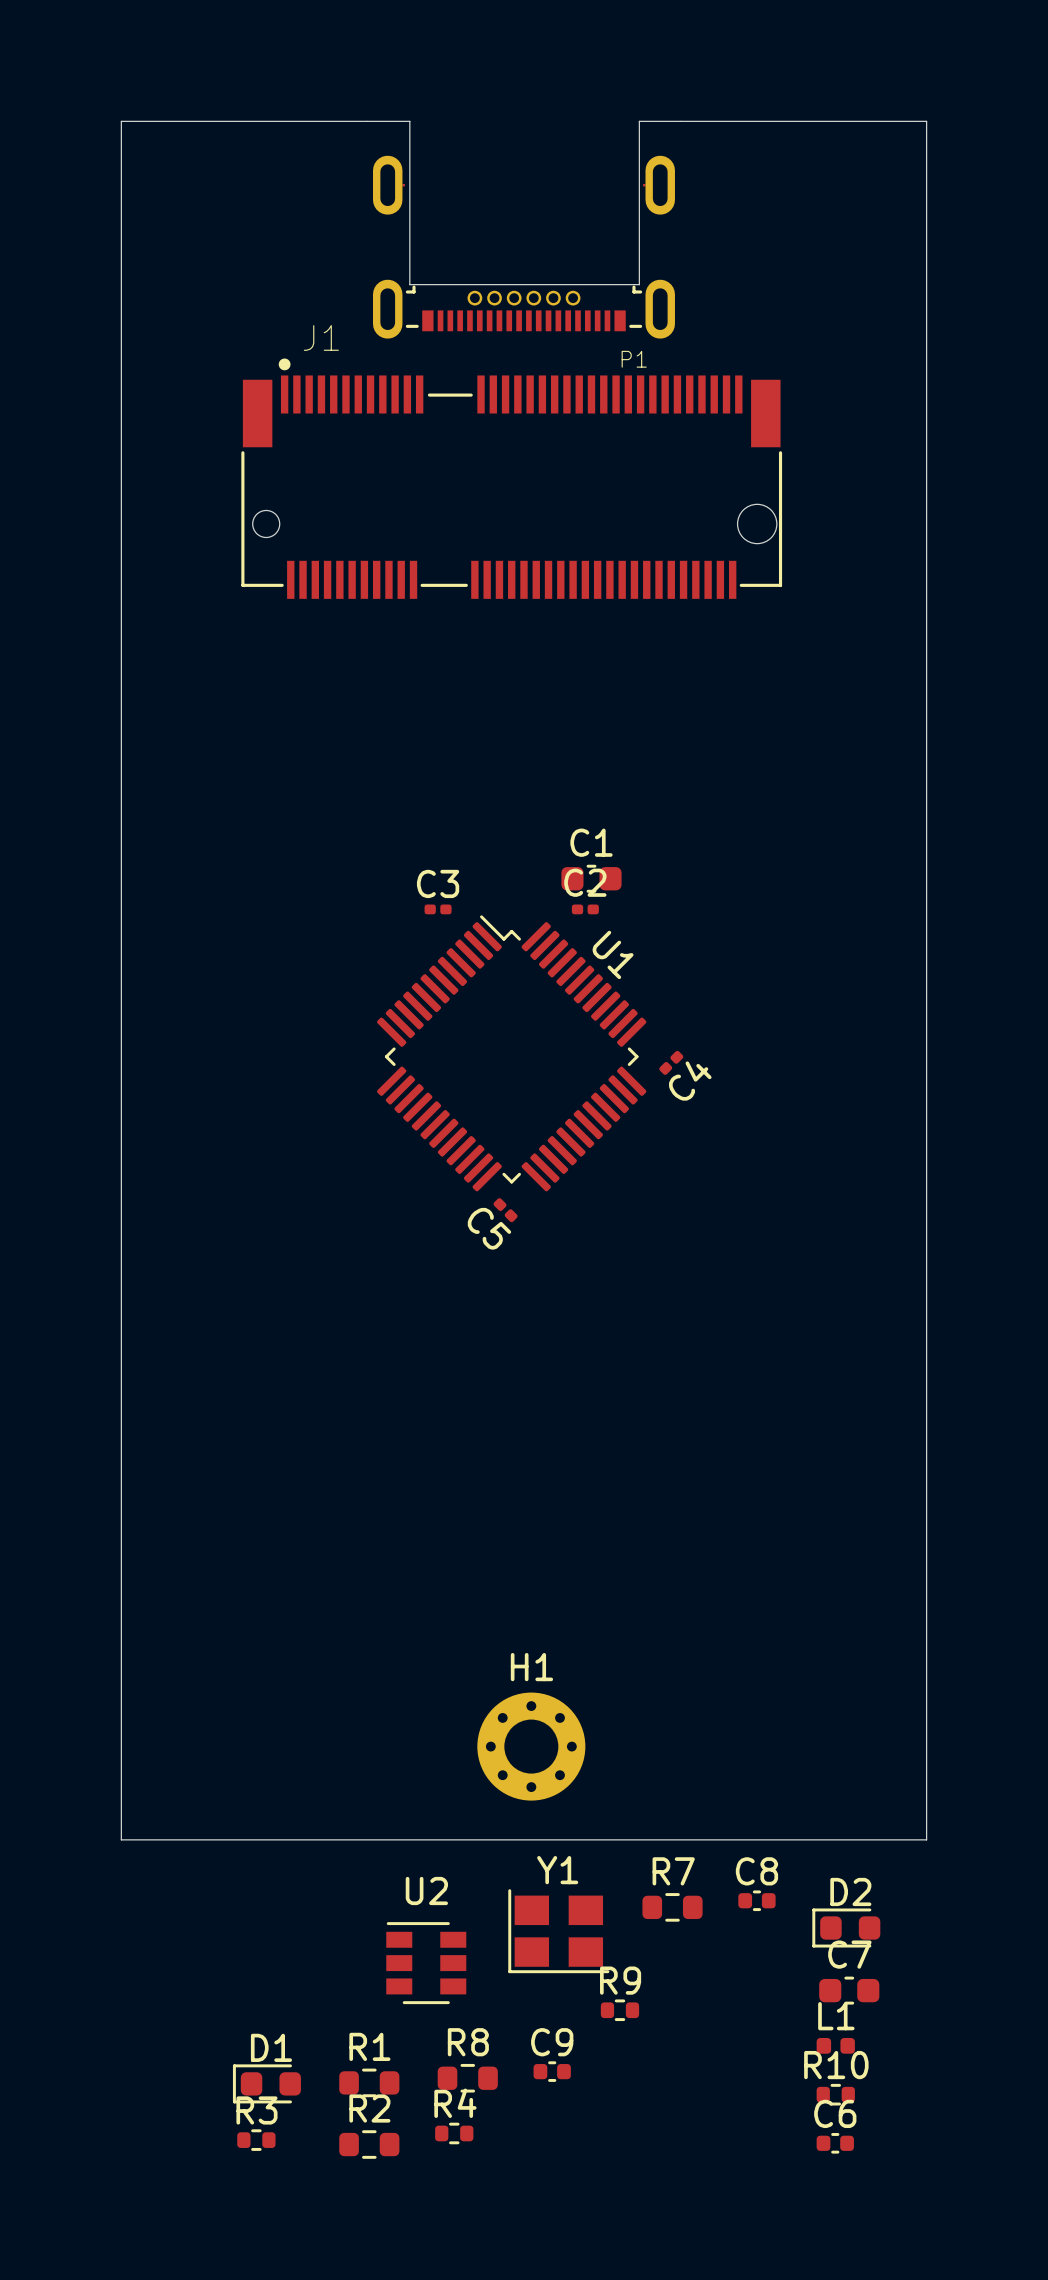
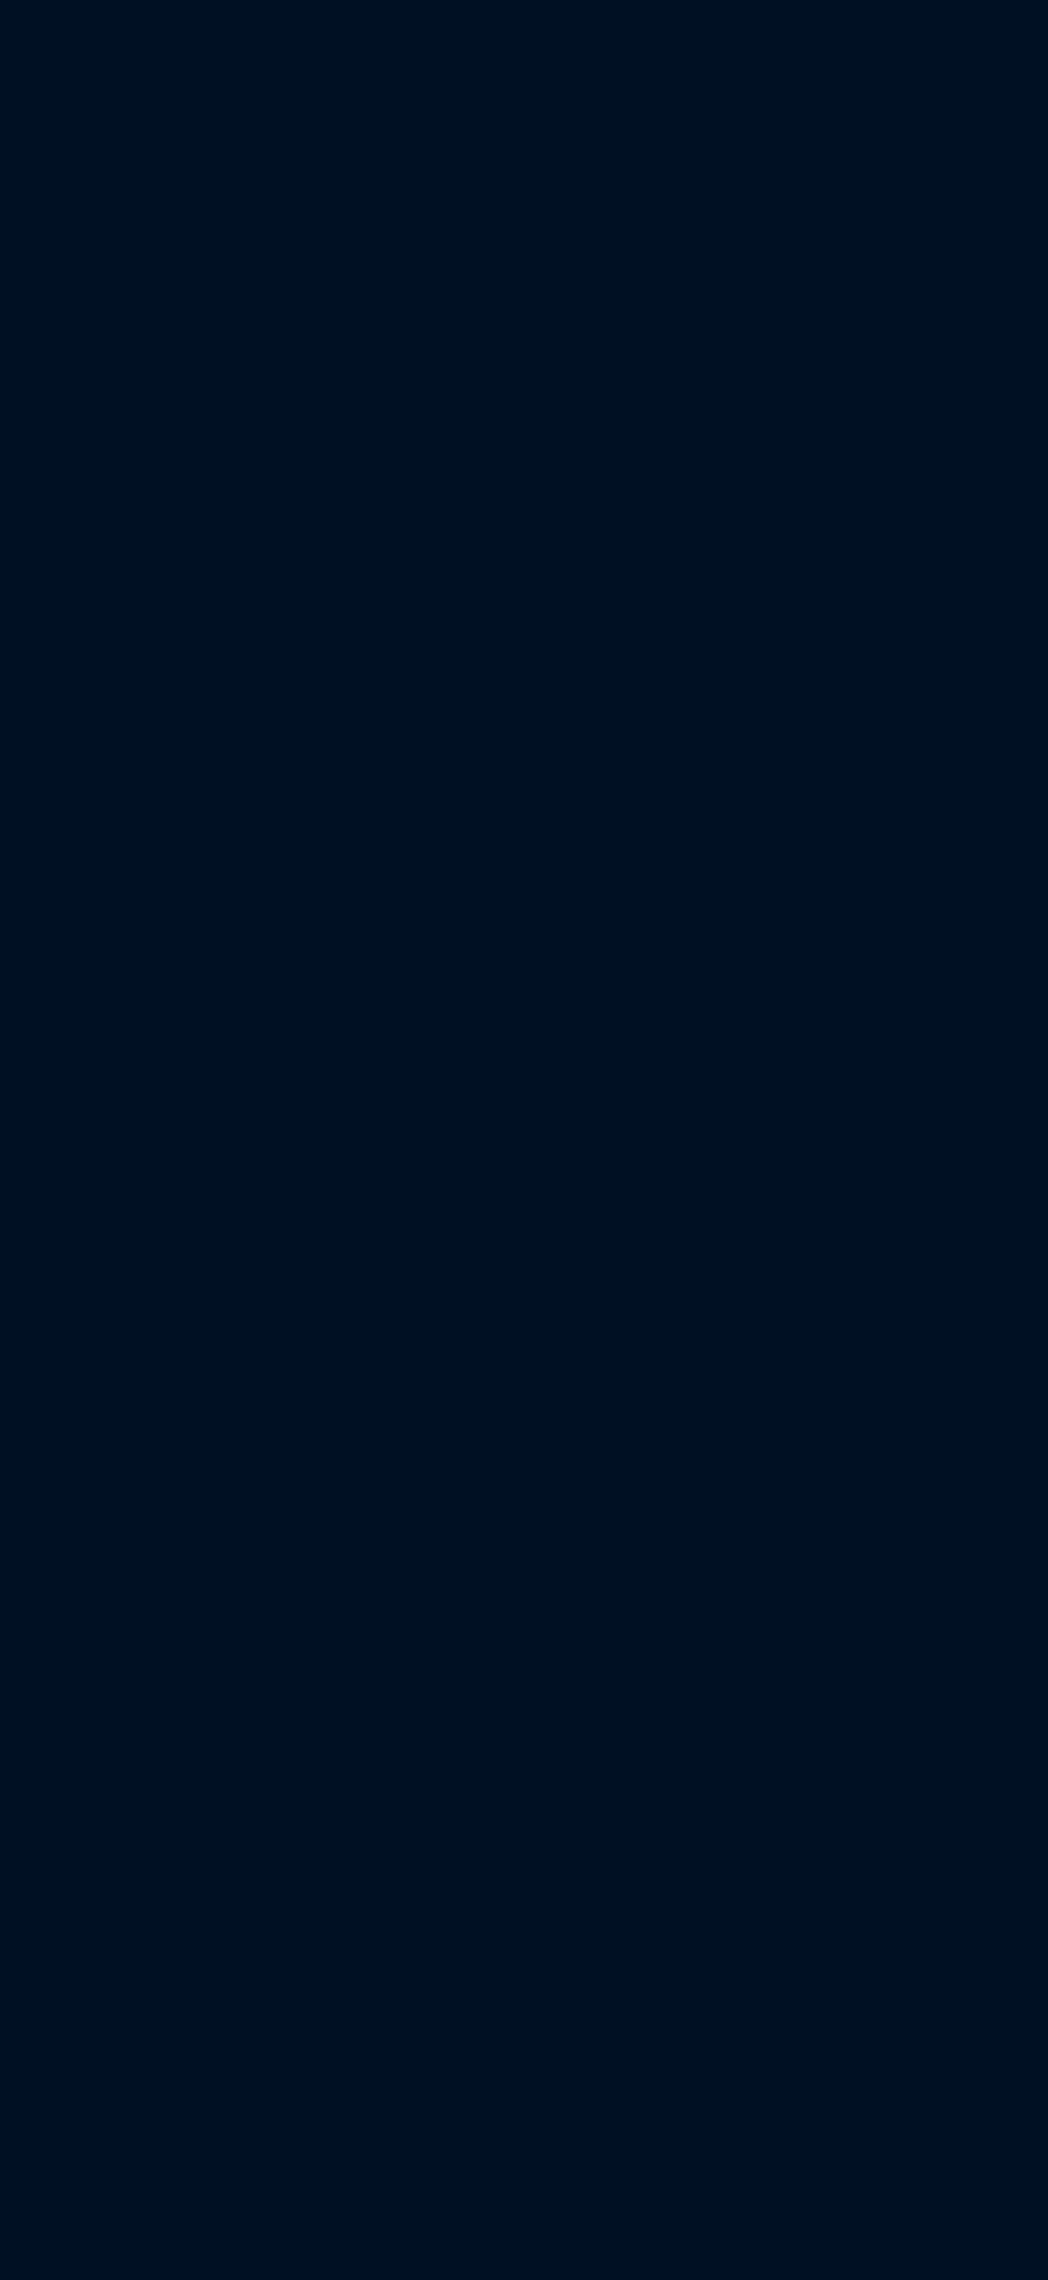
board edge: (121, 121) (409, 121) (409, 284) (639, 284) (639, 121) (926, 121) (926, 1839) (121, 1839) (121, 121) -> none
P1: (523, 247) -> none
J1: (511, 478) -> none
C1: (591, 878) -> none
C3: (438, 909) -> none
C2: (585, 909) -> none
U1: (511, 1053) -> none
C4: (671, 1062) -> none
C5: (505, 1210) -> none
H1: (531, 1746) -> none
C8: (756, 1900) -> none
R7: (672, 1907) -> none
D2: (846, 1928) -> none
Y1: (558, 1931) -> none
U2: (426, 1963) -> none
C7: (849, 1990) -> none
R9: (619, 2010) -> none
L1: (835, 2045) -> none
C9: (552, 2071) -> none
R8: (467, 2078) -> none
R1: (369, 2082) -> none
D1: (266, 2083) -> none
R10: (835, 2094) -> none
R4: (454, 2133) -> none
R3: (256, 2140) -> none
C6: (835, 2143) -> none
R2: (369, 2144) -> none

